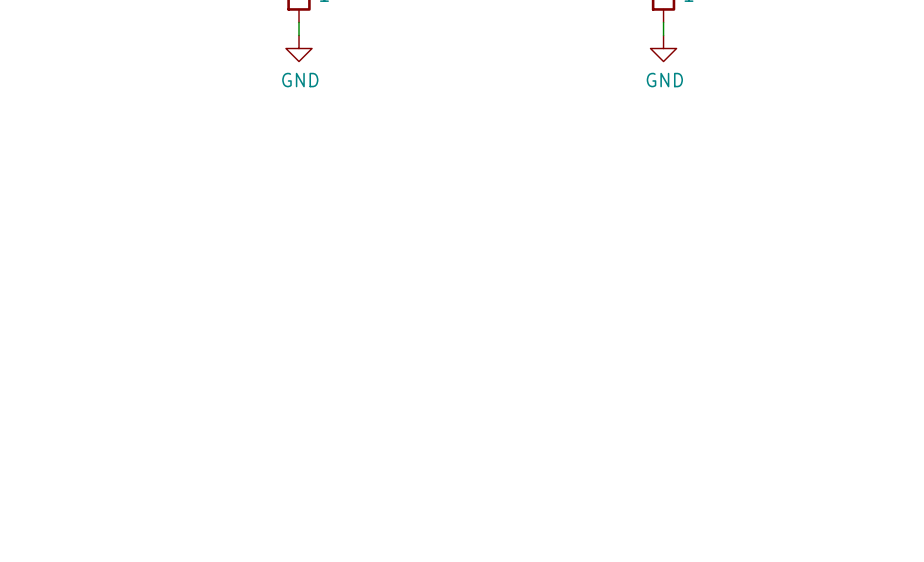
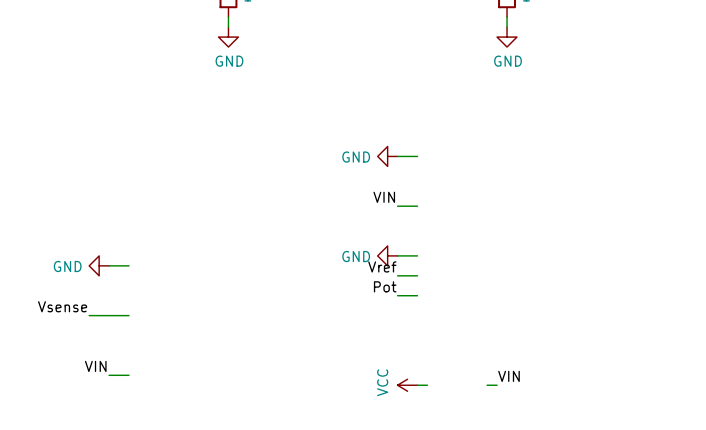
power symbol: none -> GND (387, 156)
wire: none -> (397, 156) (417, 156)
label: none -> VIN (384, 197)
wire: none -> (397, 206) (417, 206)
power symbol: none -> GND (387, 255)
wire: none -> (397, 255) (417, 255)
power symbol: none -> GND (99, 265)
wire: none -> (109, 265) (128, 265)
label: none -> Vref (382, 266)
wire: none -> (397, 275) (417, 275)
label: none -> Pot (385, 286)
wire: none -> (397, 295) (417, 295)
label: none -> Vsense (62, 306)
wire: none -> (89, 315) (128, 315)
label: none -> VIN (95, 366)
wire: none -> (109, 375) (128, 375)
label: none -> VIN (508, 376)
power symbol: none -> VCC (407, 385)
wire: none -> (417, 385) (427, 385)
wire: none -> (487, 385) (497, 385)

